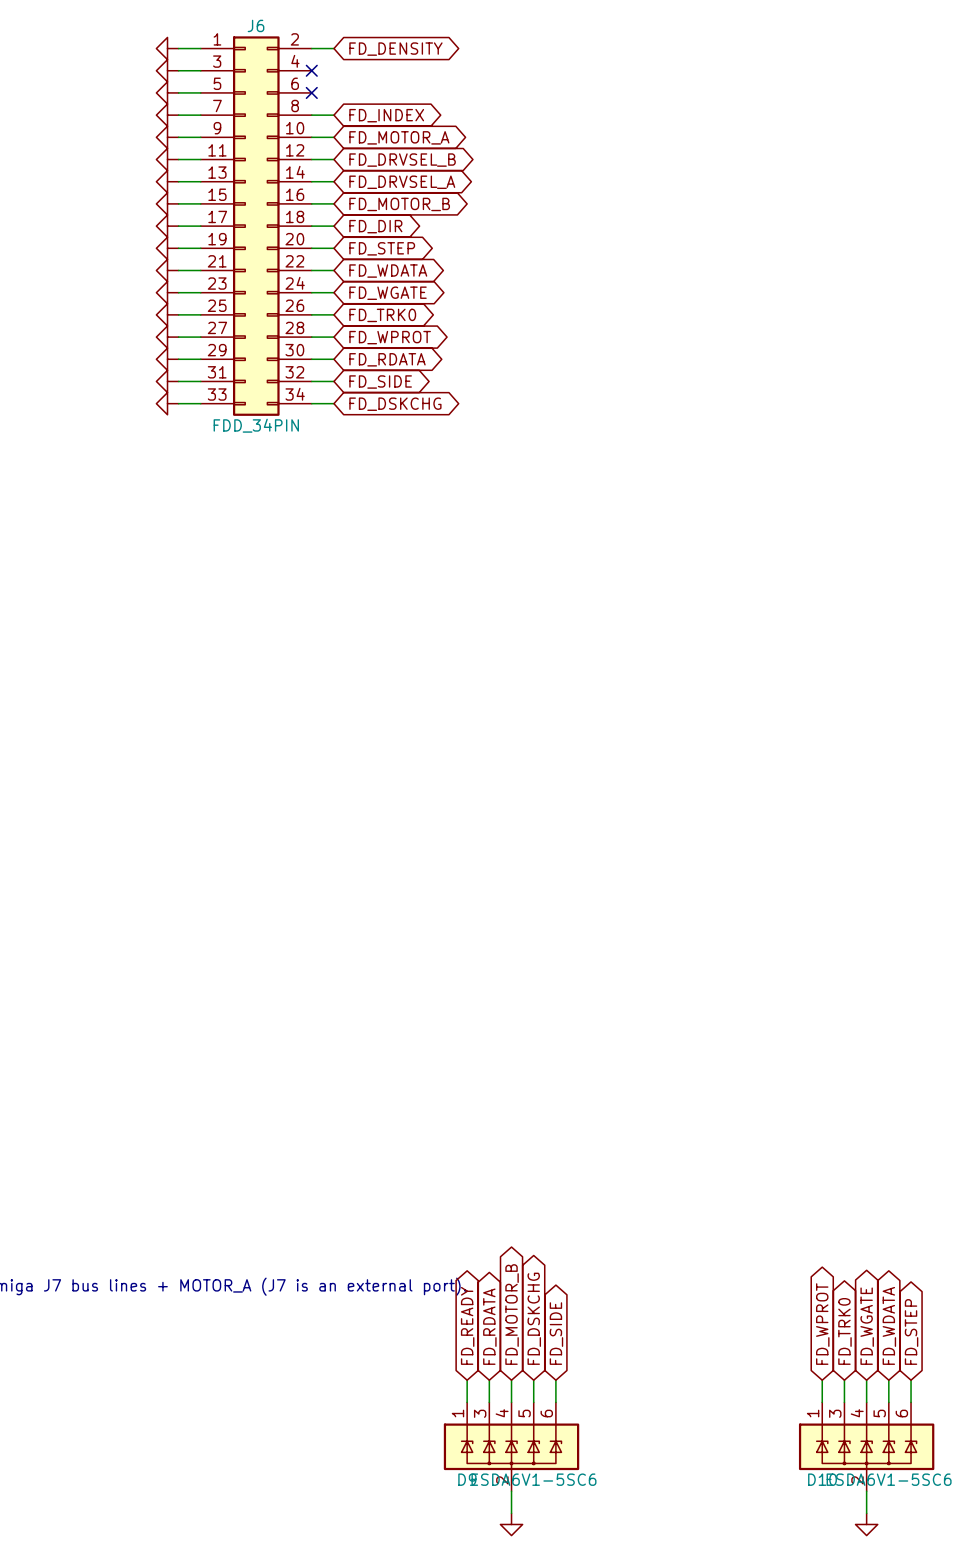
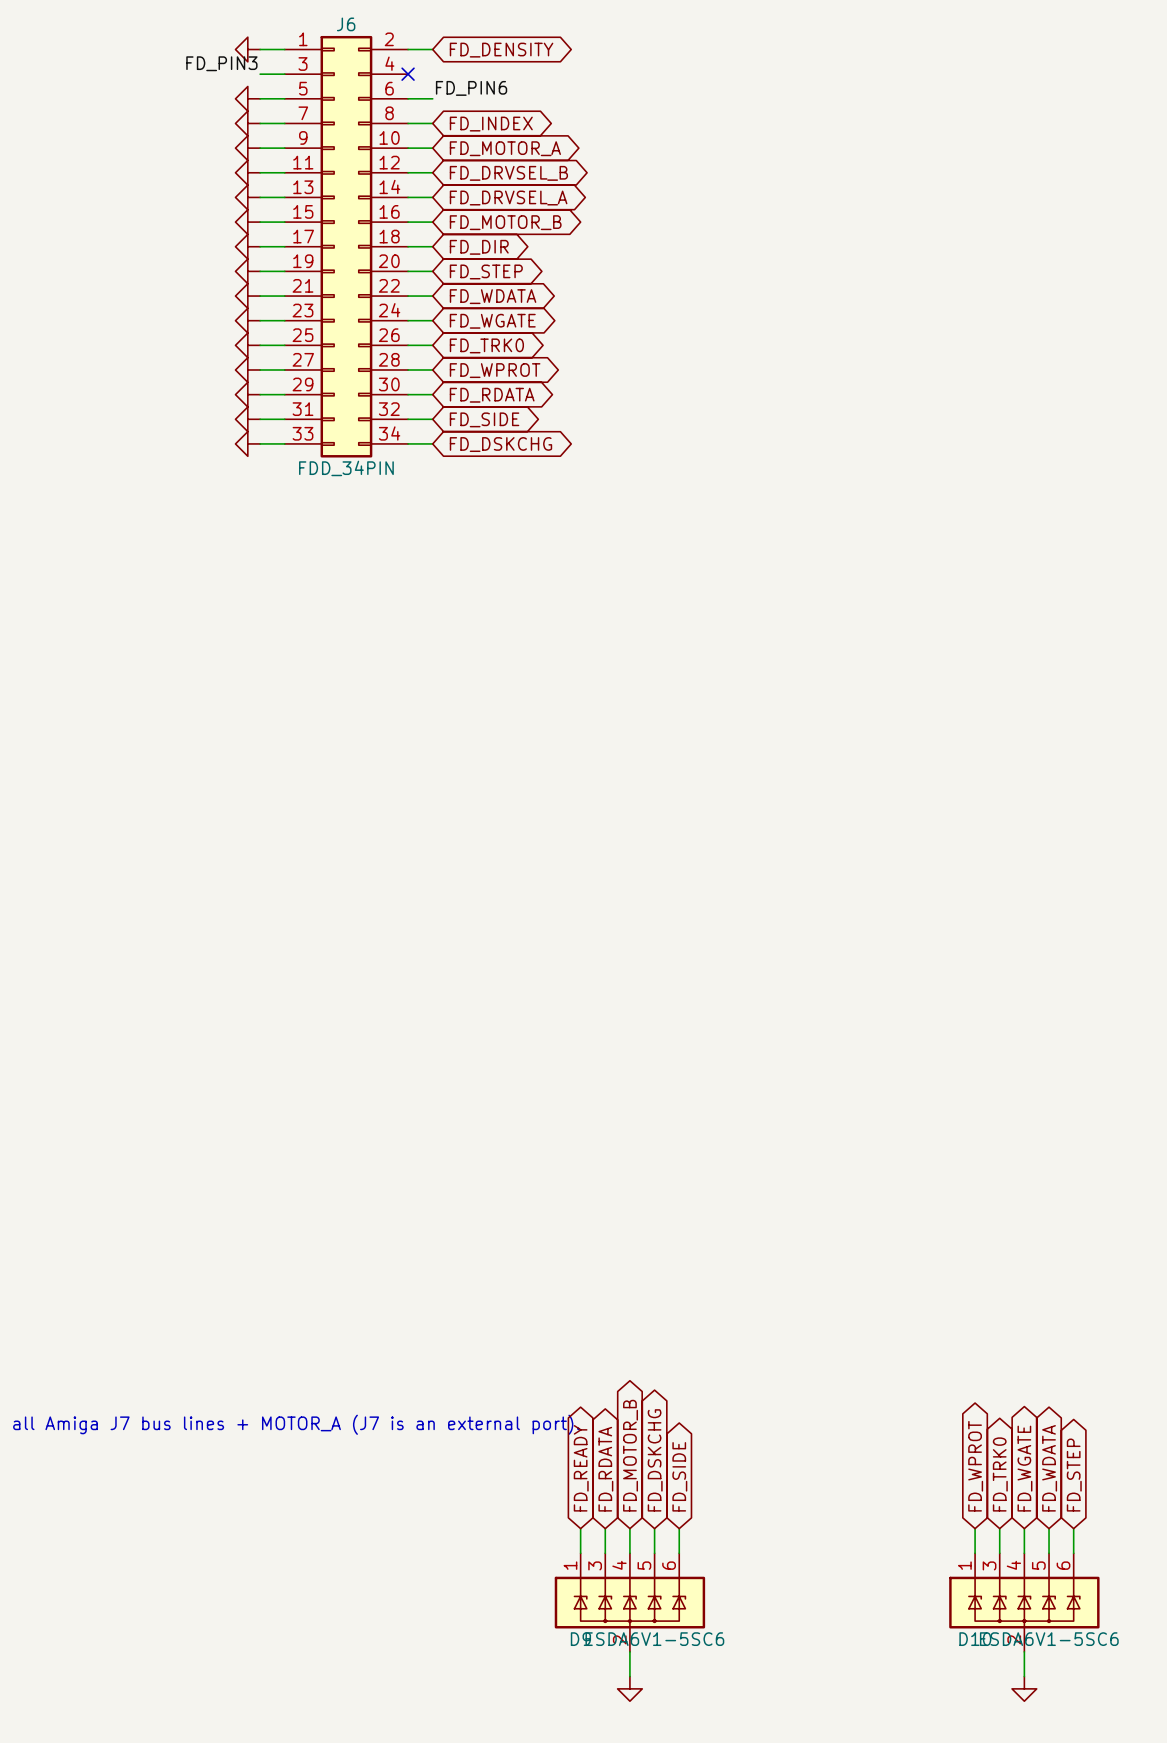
label: none -> FD_PIN3 (221, 63)
power symbol: (167, 70) -> none
label: none -> FD_PIN6 (471, 88)
wire: none -> (408, 98) (432, 98)
no-connect mark: (311, 92) -> none

